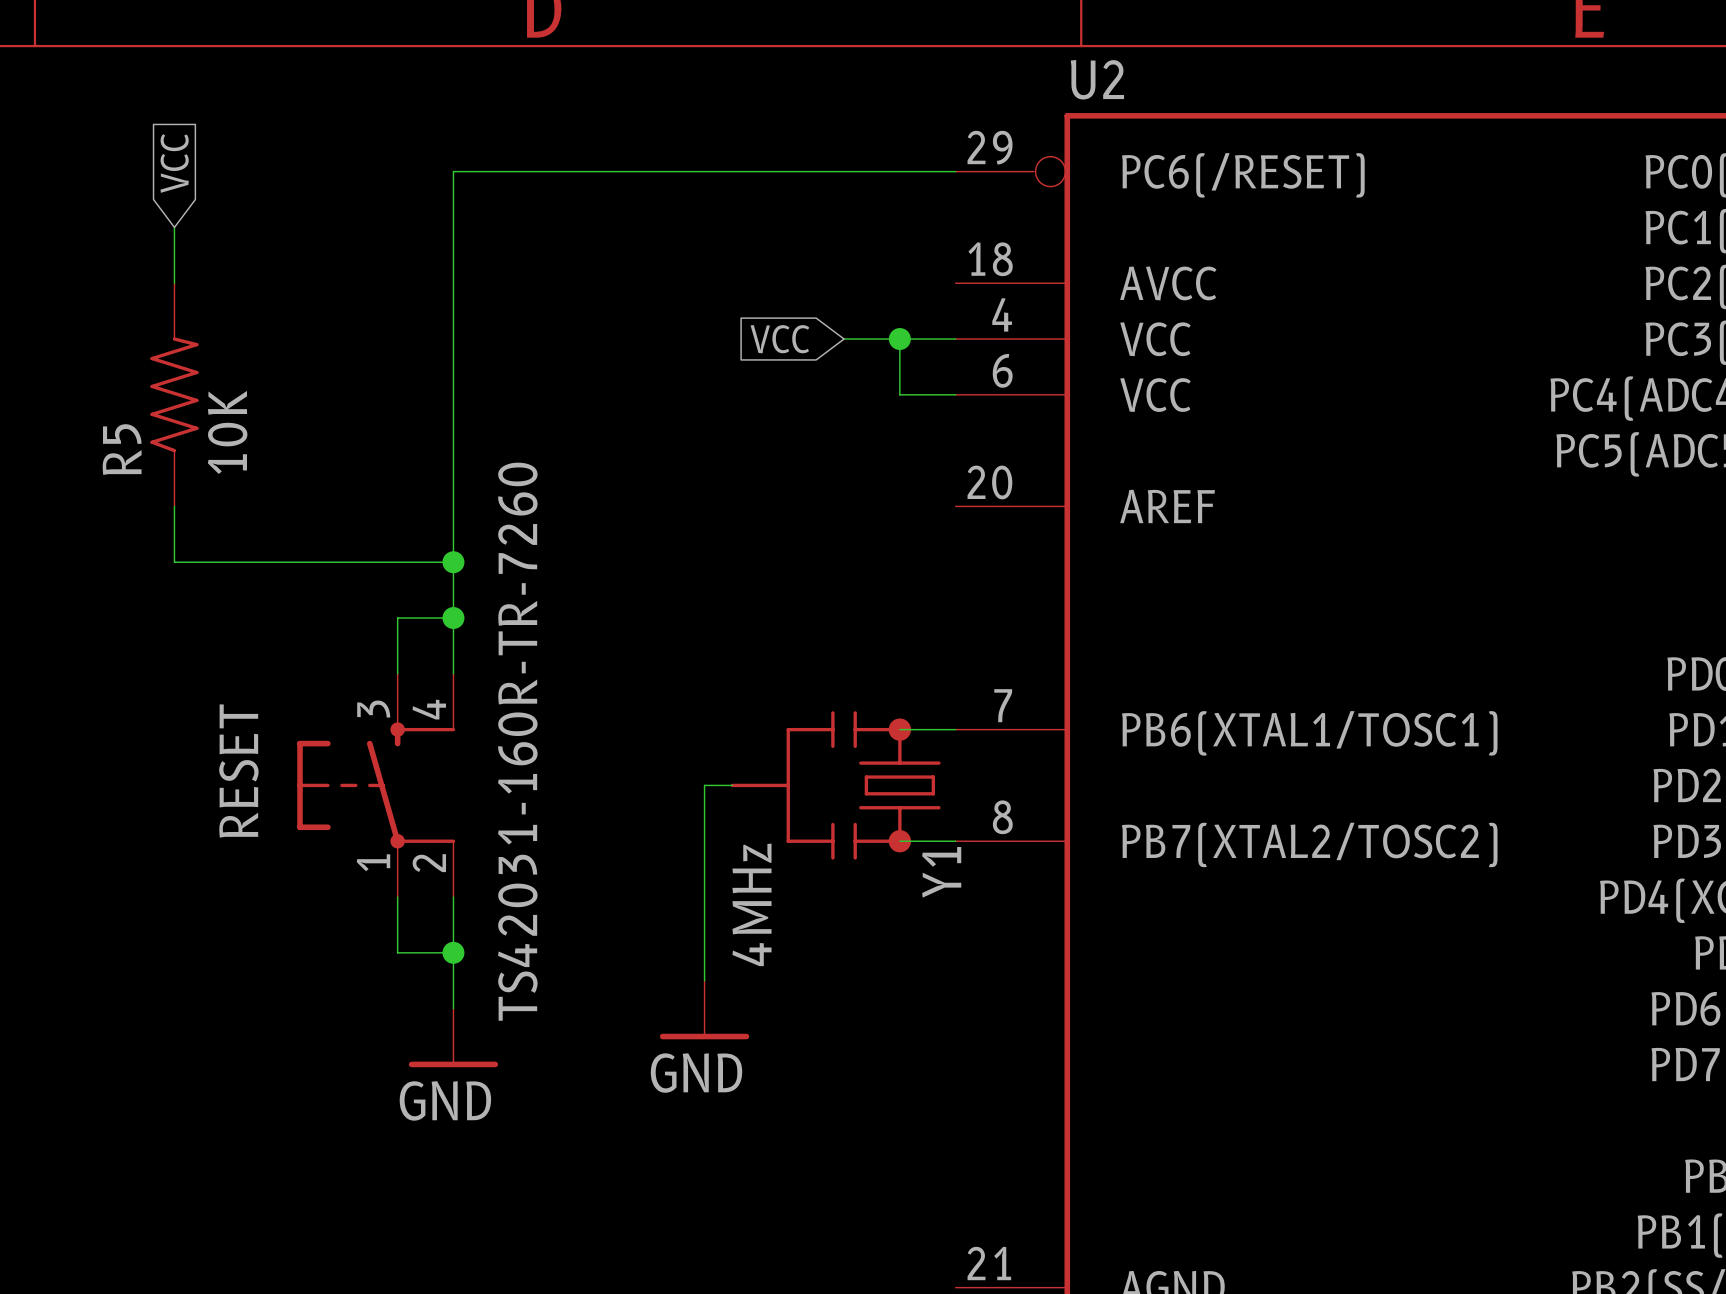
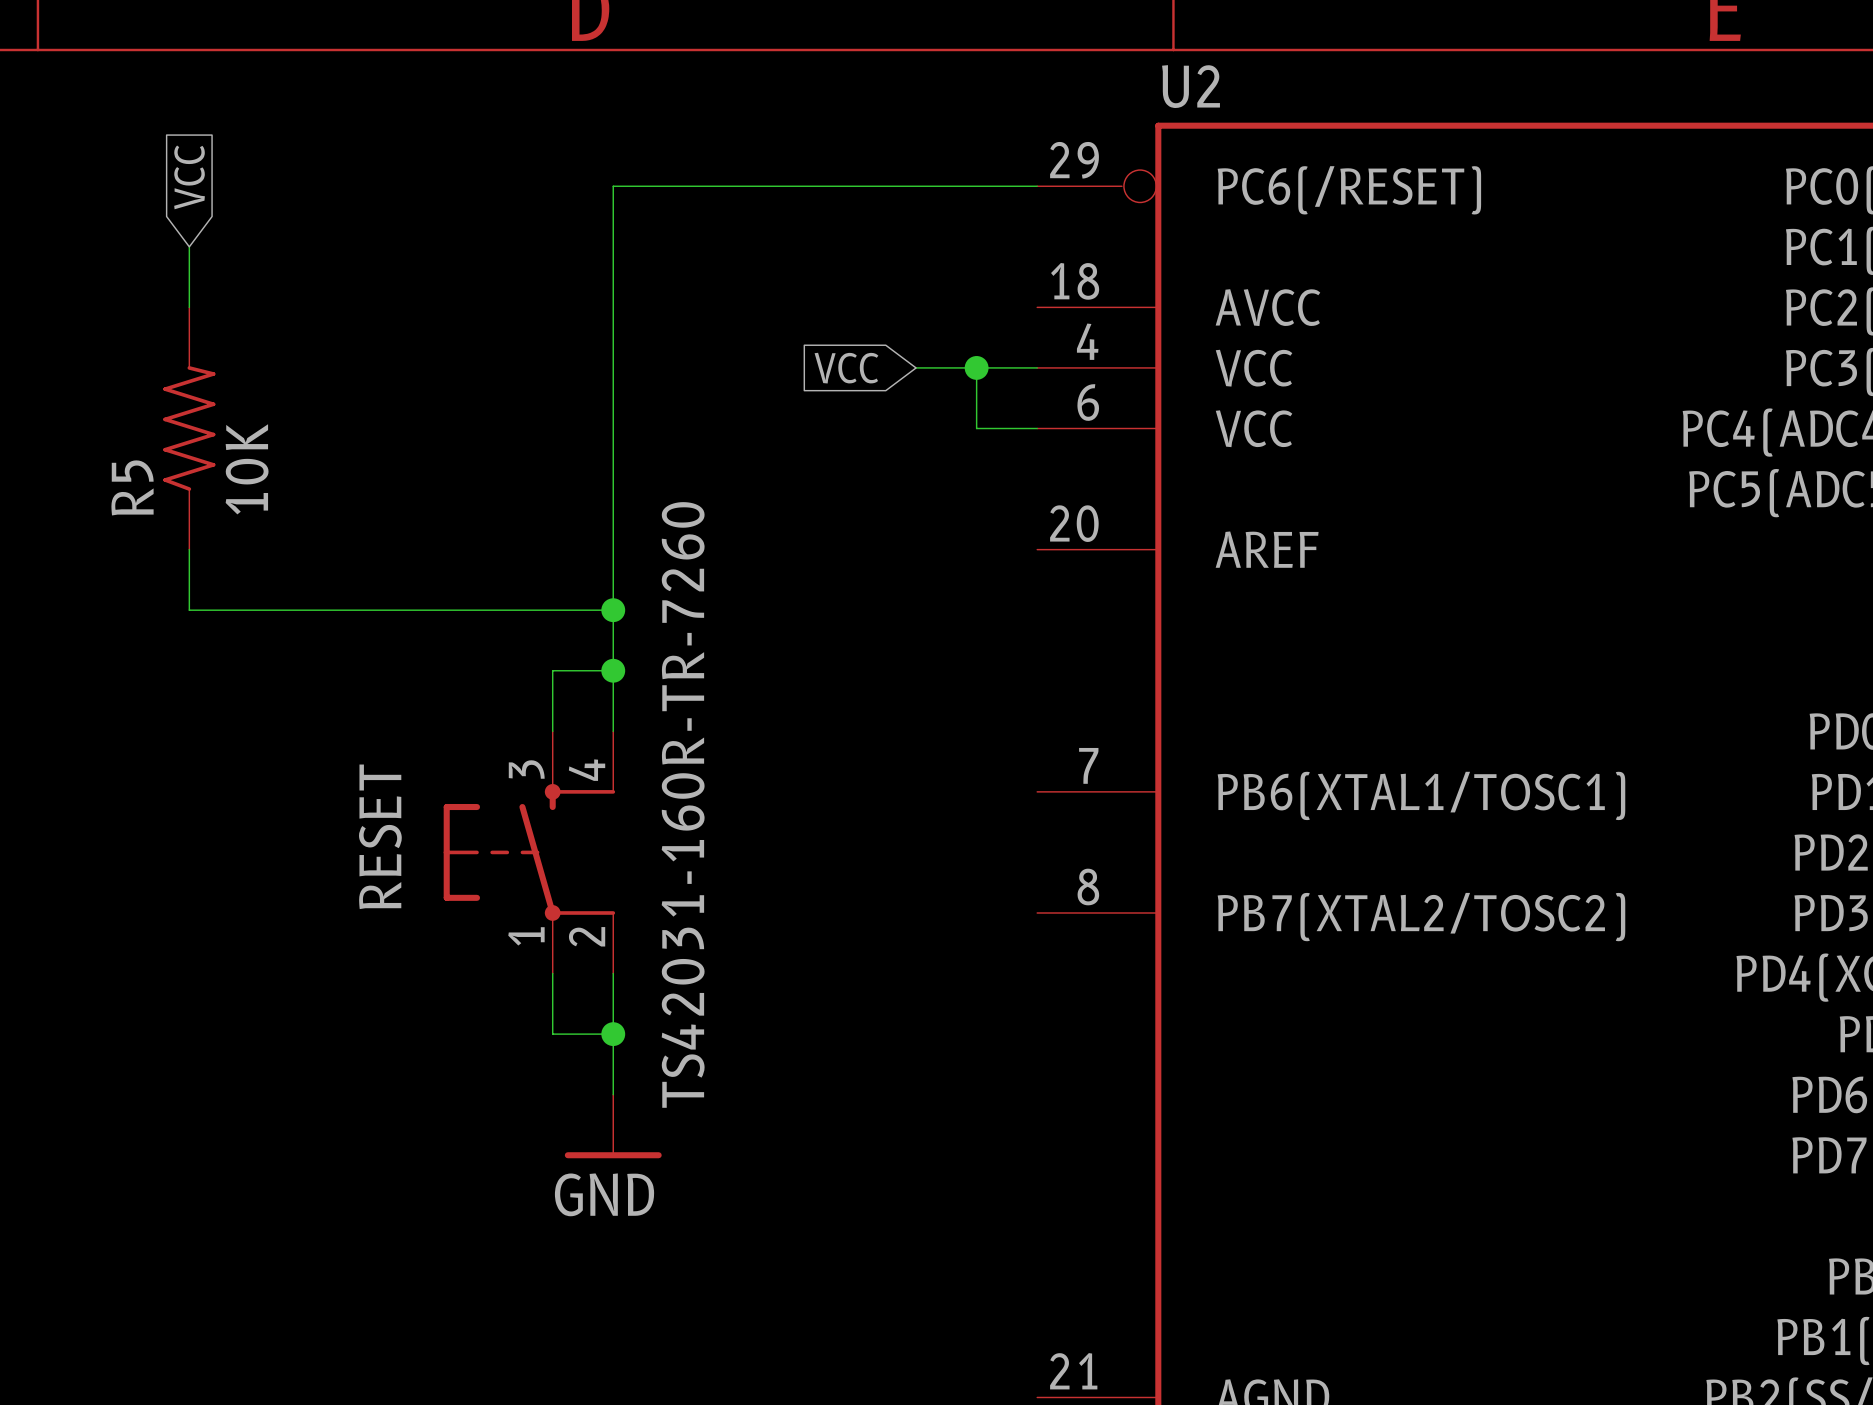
wire: (565, 171) (453, 171) (453, 673) -> (613, 186) (613, 731)
wire: none -> (492, 610) (613, 610)
junction: (453, 562) -> none
junction: none -> (613, 610)
wire: (453, 618) (397, 618) (397, 673) -> (613, 670) (552, 670) (552, 731)
junction: (453, 618) -> none
junction: none -> (613, 670)
wire: (899, 729) (955, 729) -> none
RESET position: (376, 785) -> (529, 852)
wire: (732, 785) (704, 785) (704, 980) -> none
Y1: 4MHz (835, 785) -> none
wire: (899, 841) (955, 841) -> none
wire: (397, 897) (397, 952) (453, 952) -> (552, 973) (552, 1034) (613, 1034)
wire: (453, 897) (453, 1008) -> (613, 973) (613, 1094)
junction position: (453, 952) -> (613, 1034)
power symbol: GND (704, 1010) -> none
power symbol: GND (453, 1037) -> none
power symbol: none -> GND (613, 1126)

